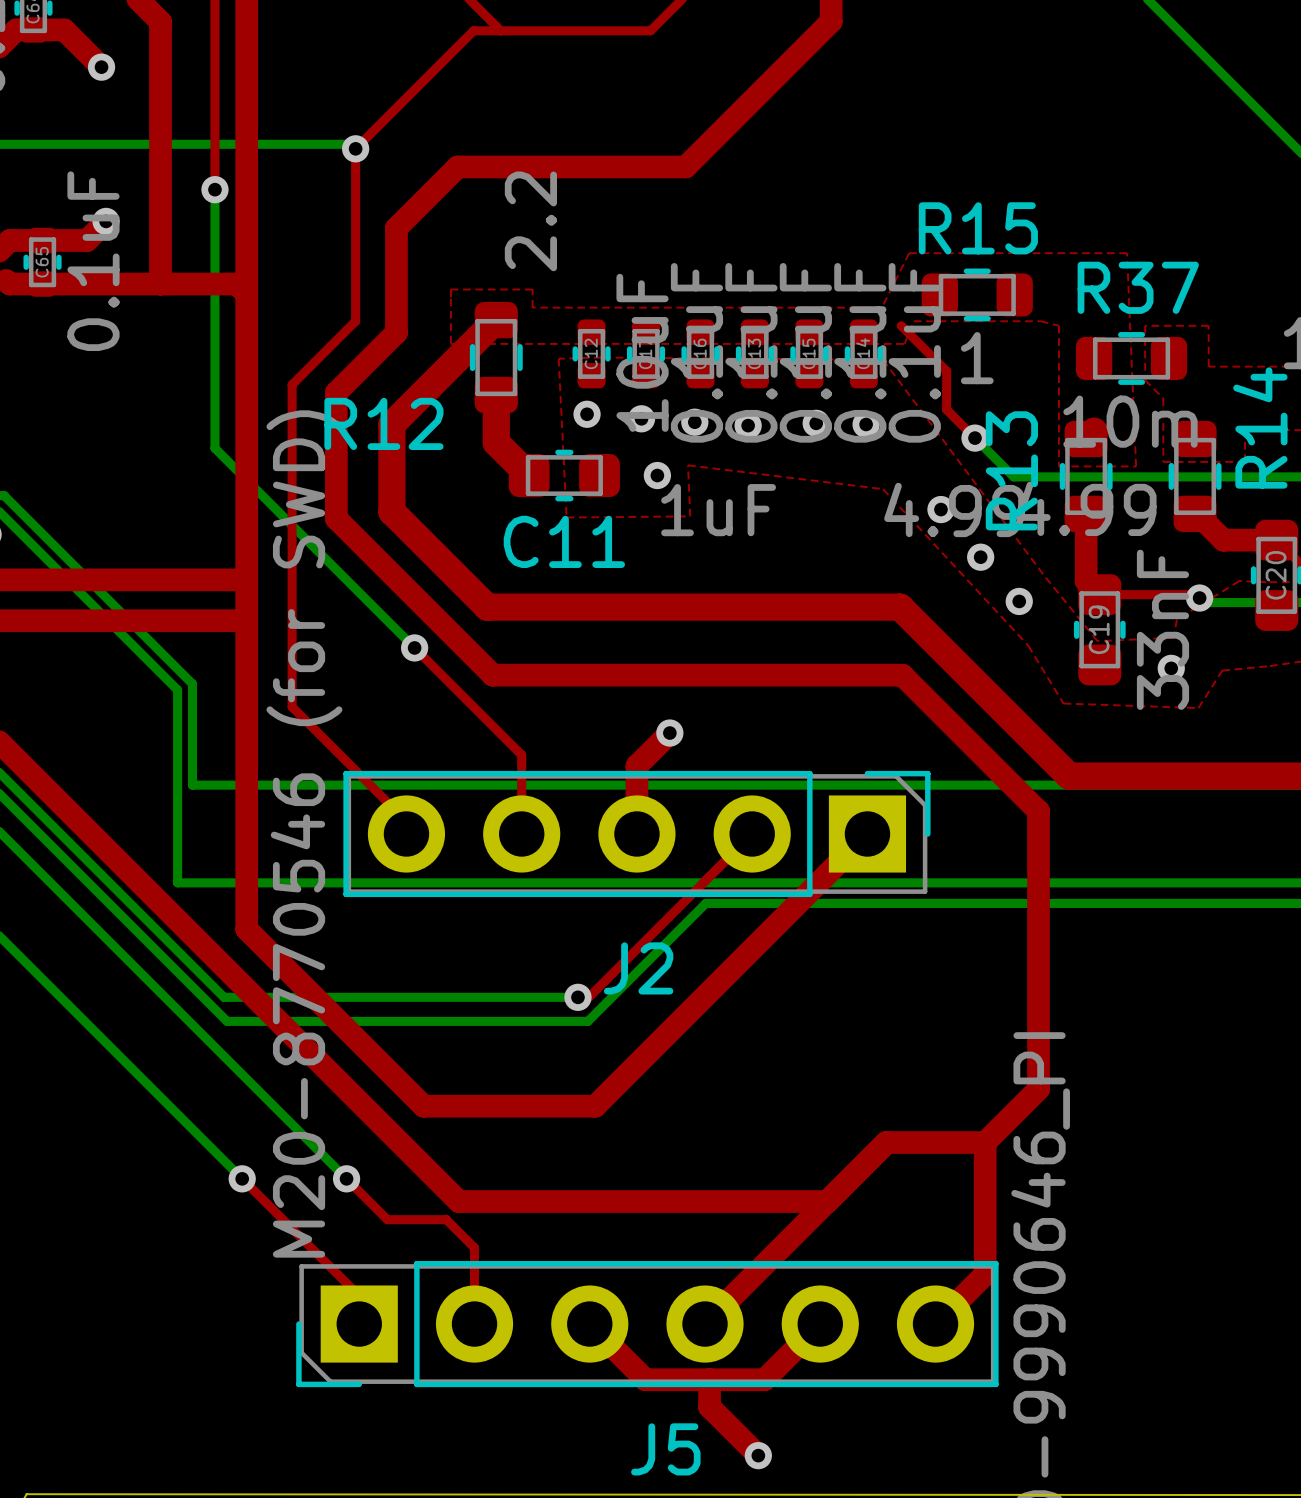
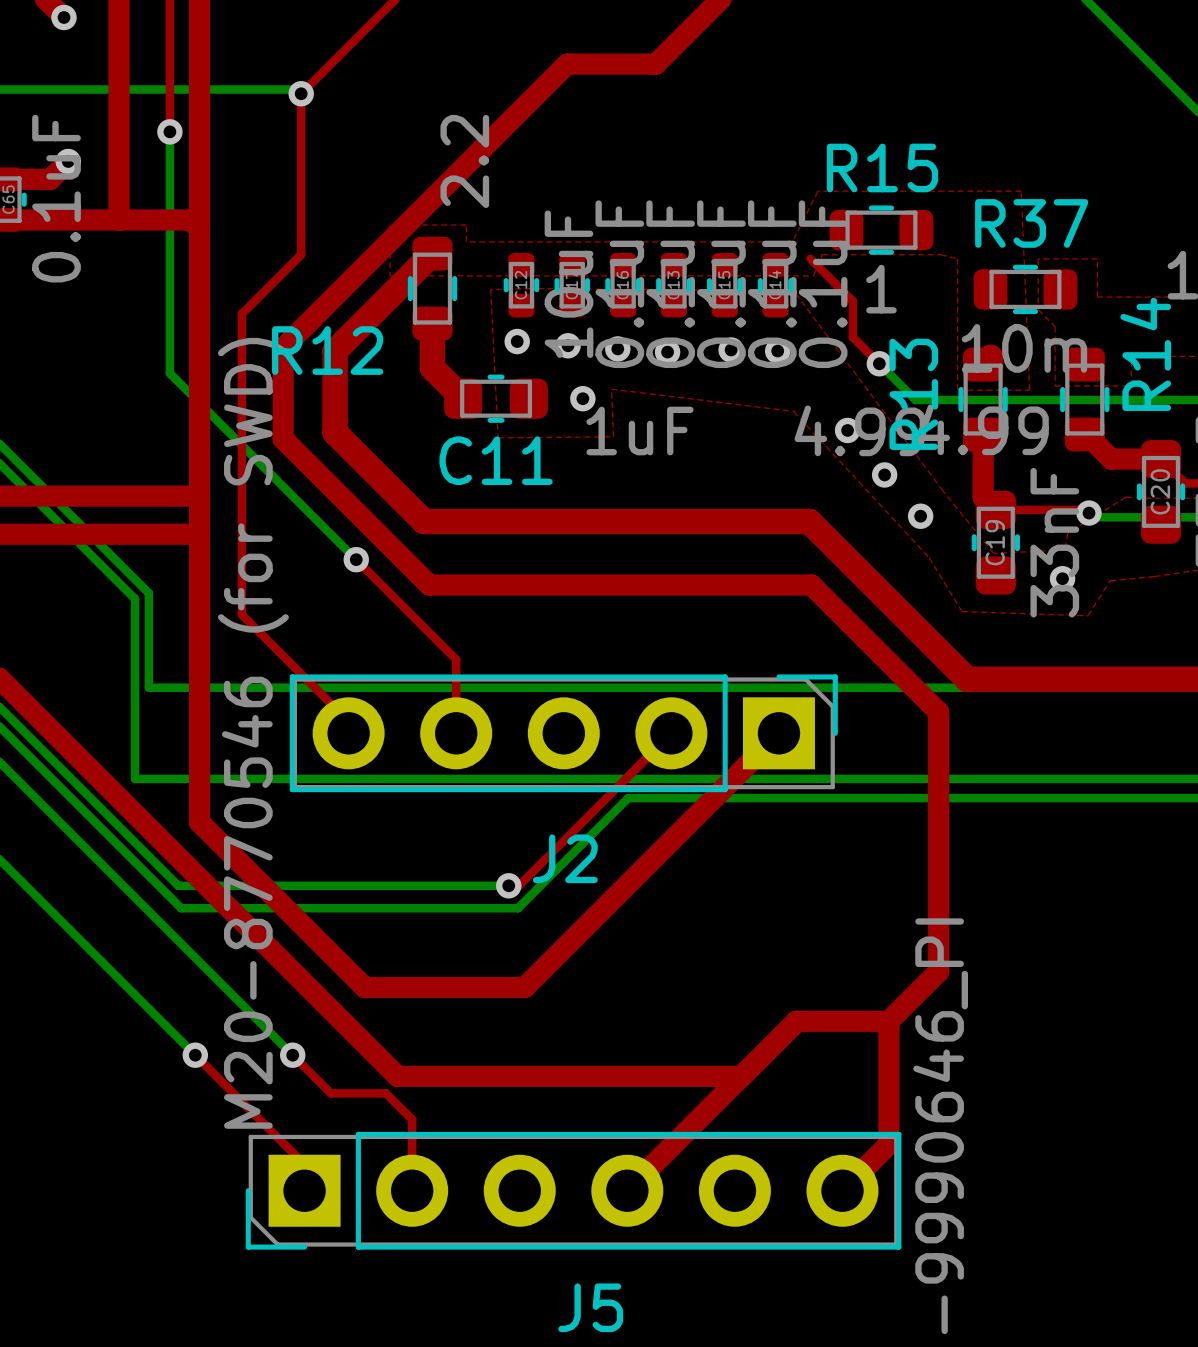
top track: (735, 117) (685, 166) (457, 166) (396, 228) (396, 332) (336, 392) (336, 421) -> (655, 64) (567, 64) (283, 348)
top track: (669, 733) (636, 765) (636, 833) -> none
via: (669, 733) -> none
top track: (589, 1324) (645, 1379) (764, 1379) (820, 1324) -> none
top track: (709, 1379) (709, 1406) (758, 1455) -> none
via: (758, 1455) -> none

